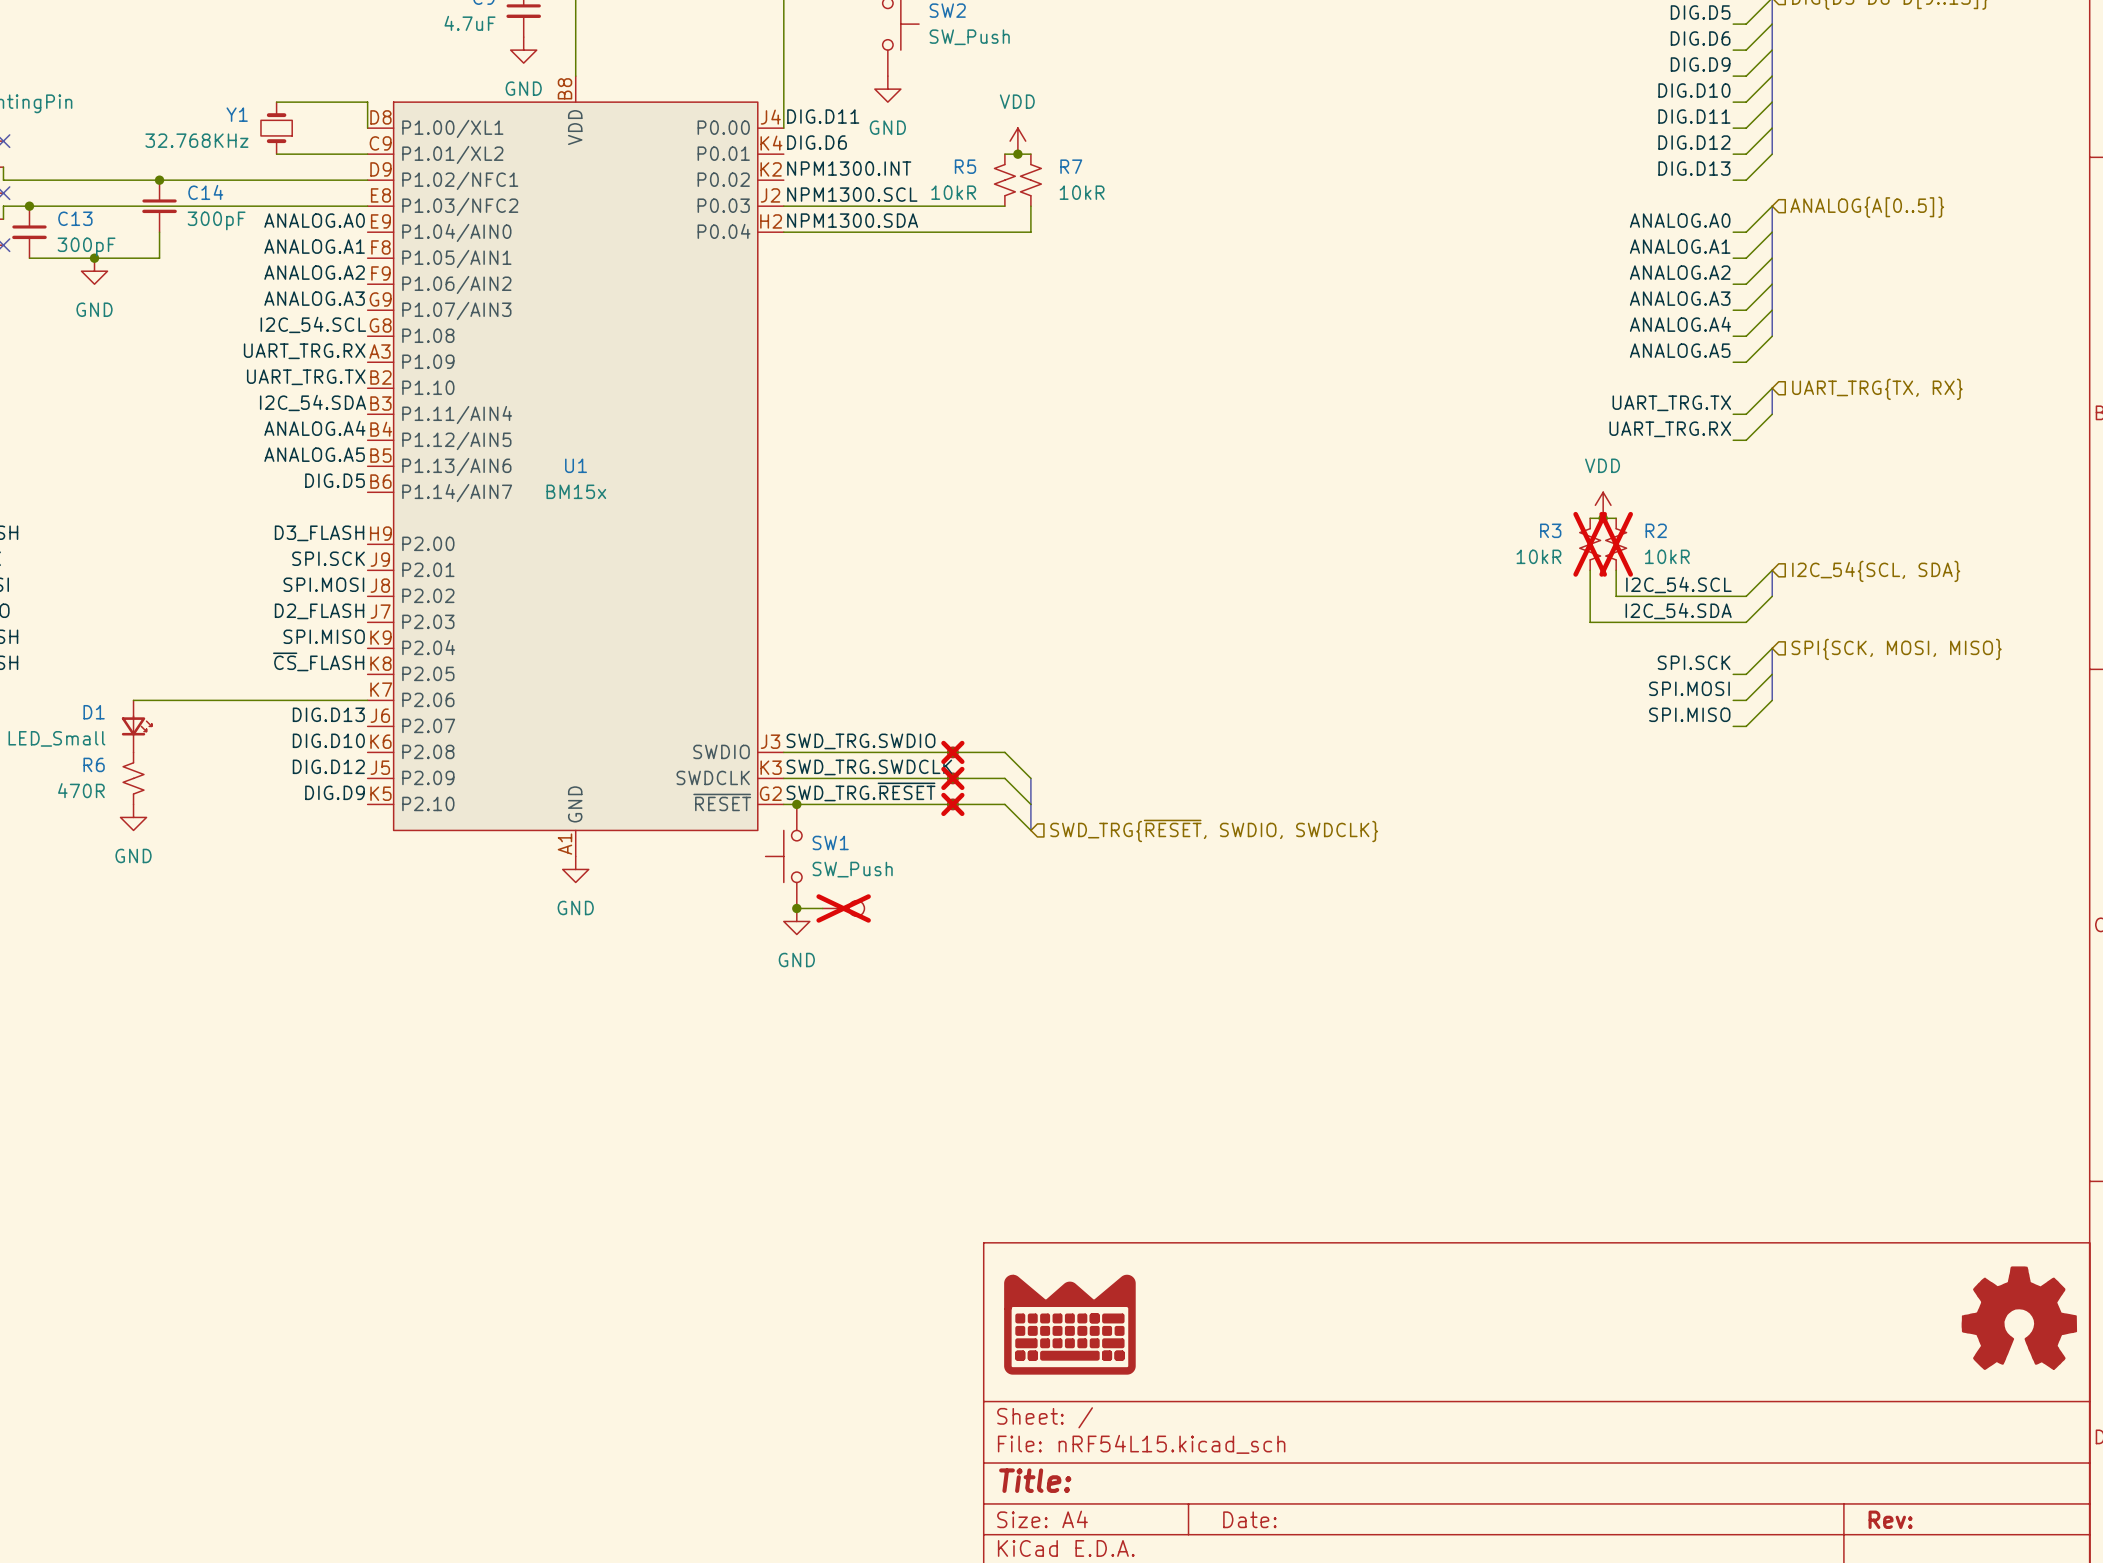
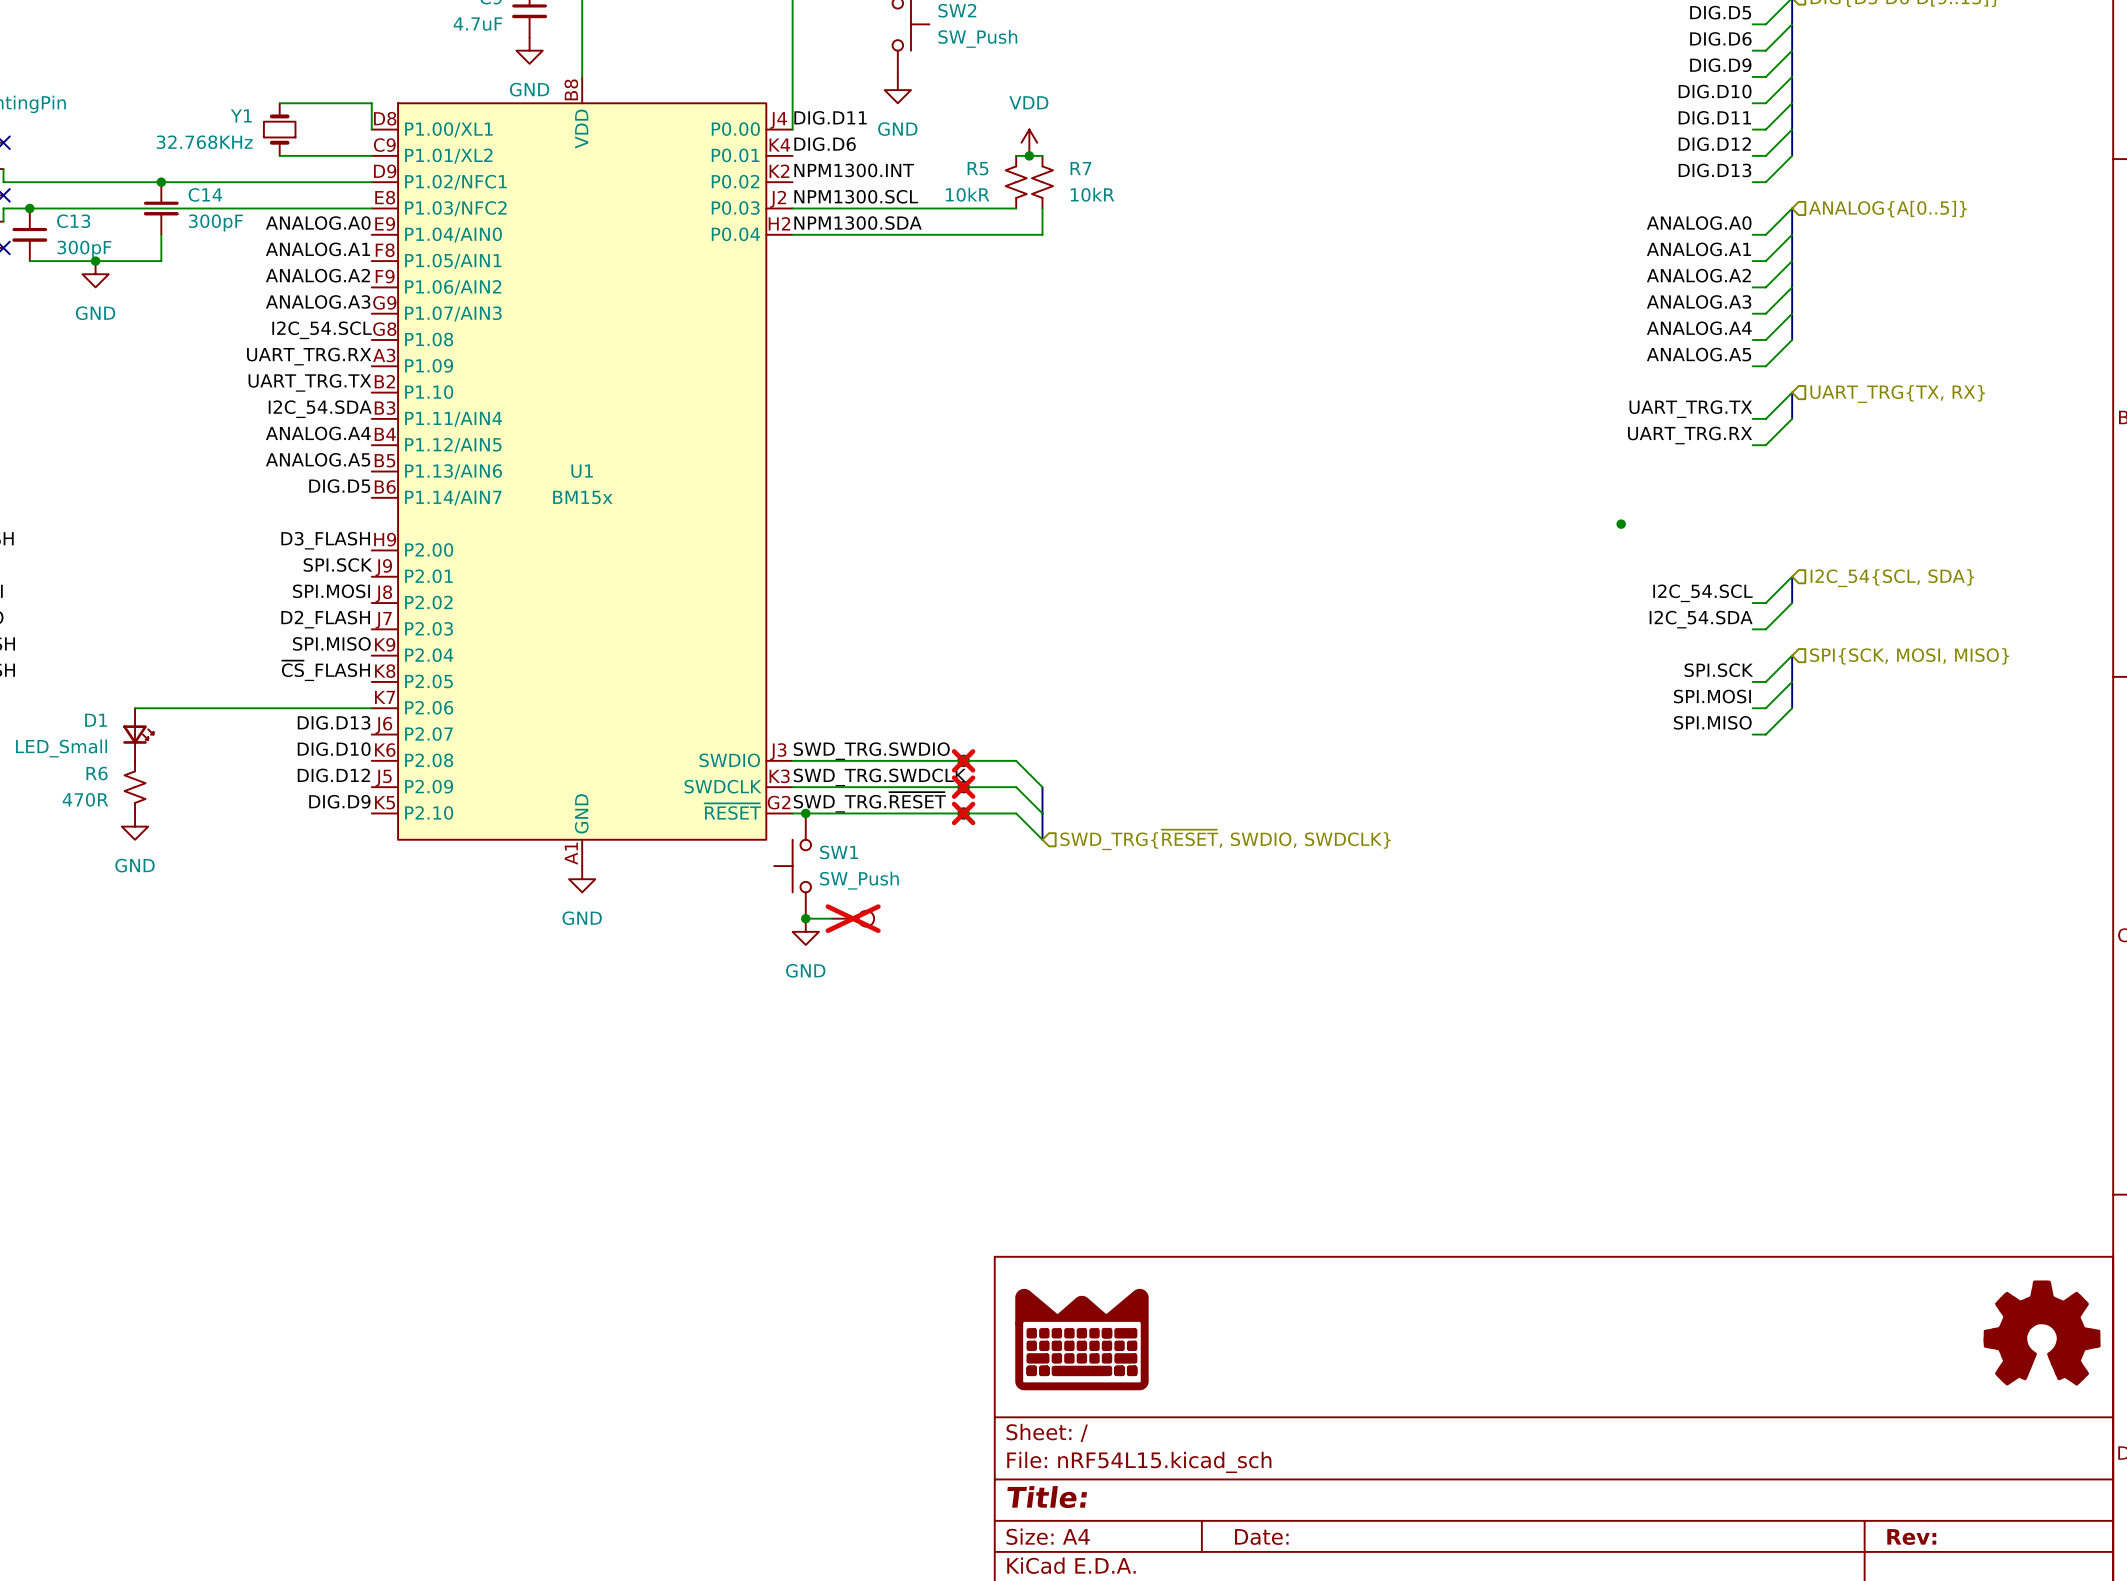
power symbol: VDD (1603, 505) -> none
wire: (1590, 518) (1616, 518) -> none
R3: 10kR (1590, 544) -> none
R2: 10kR (1616, 544) -> none
wire: (1590, 570) (1590, 622) (1733, 622) -> none
wire: (1616, 570) (1616, 596) (1733, 596) -> none

